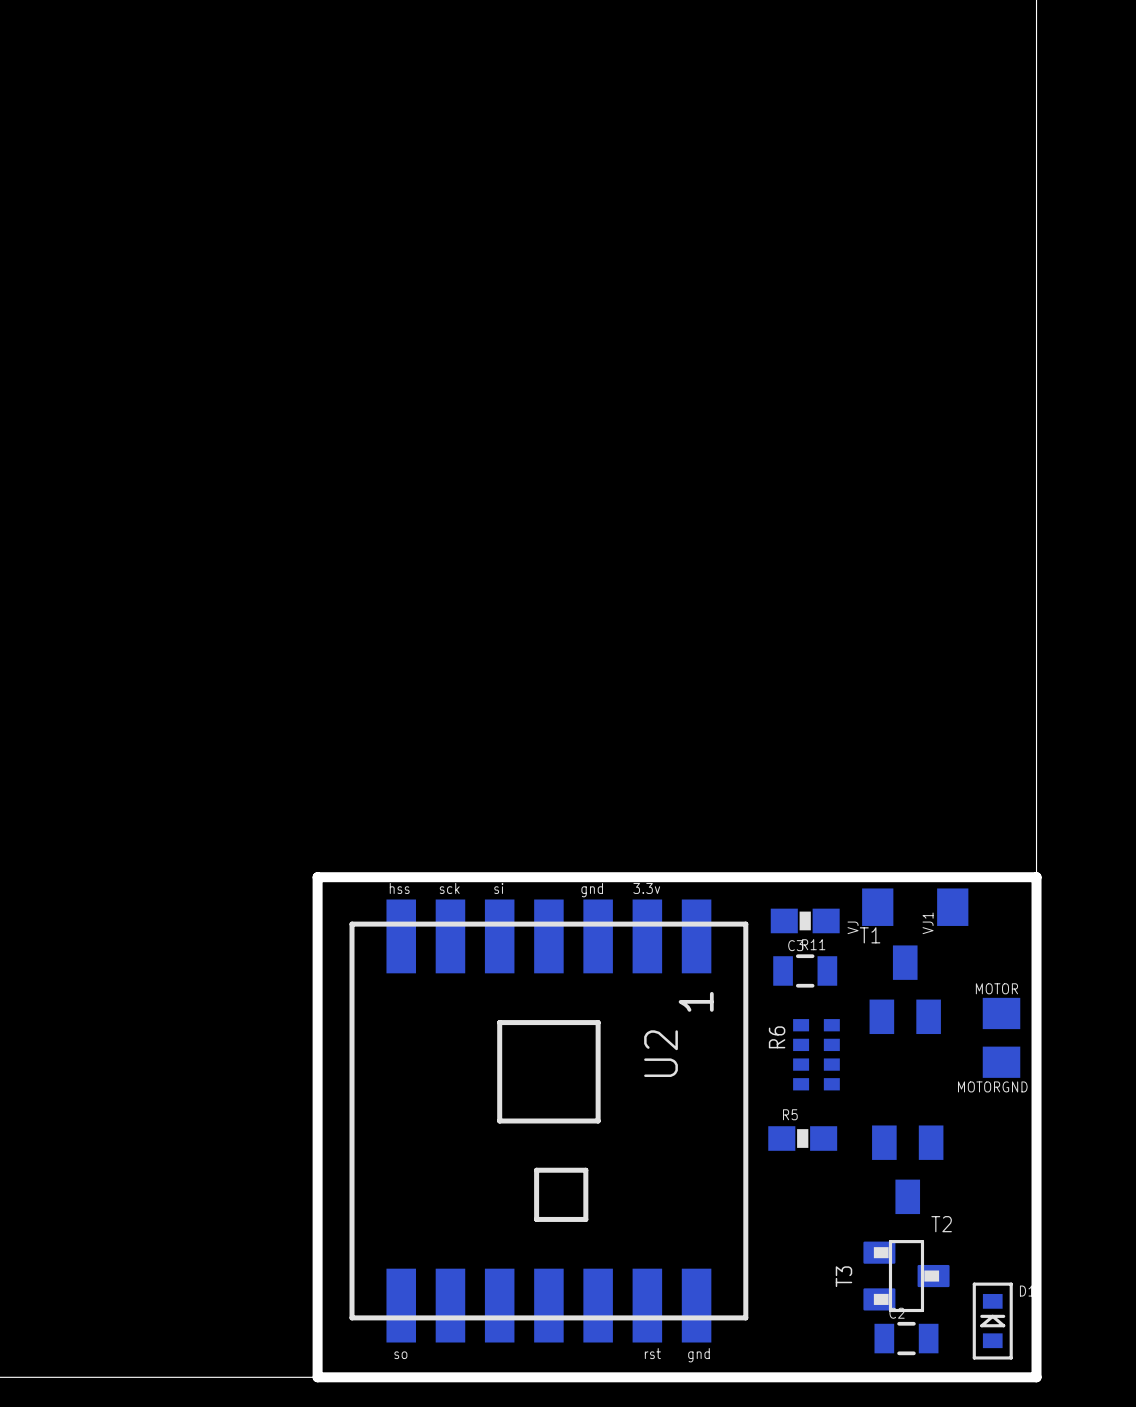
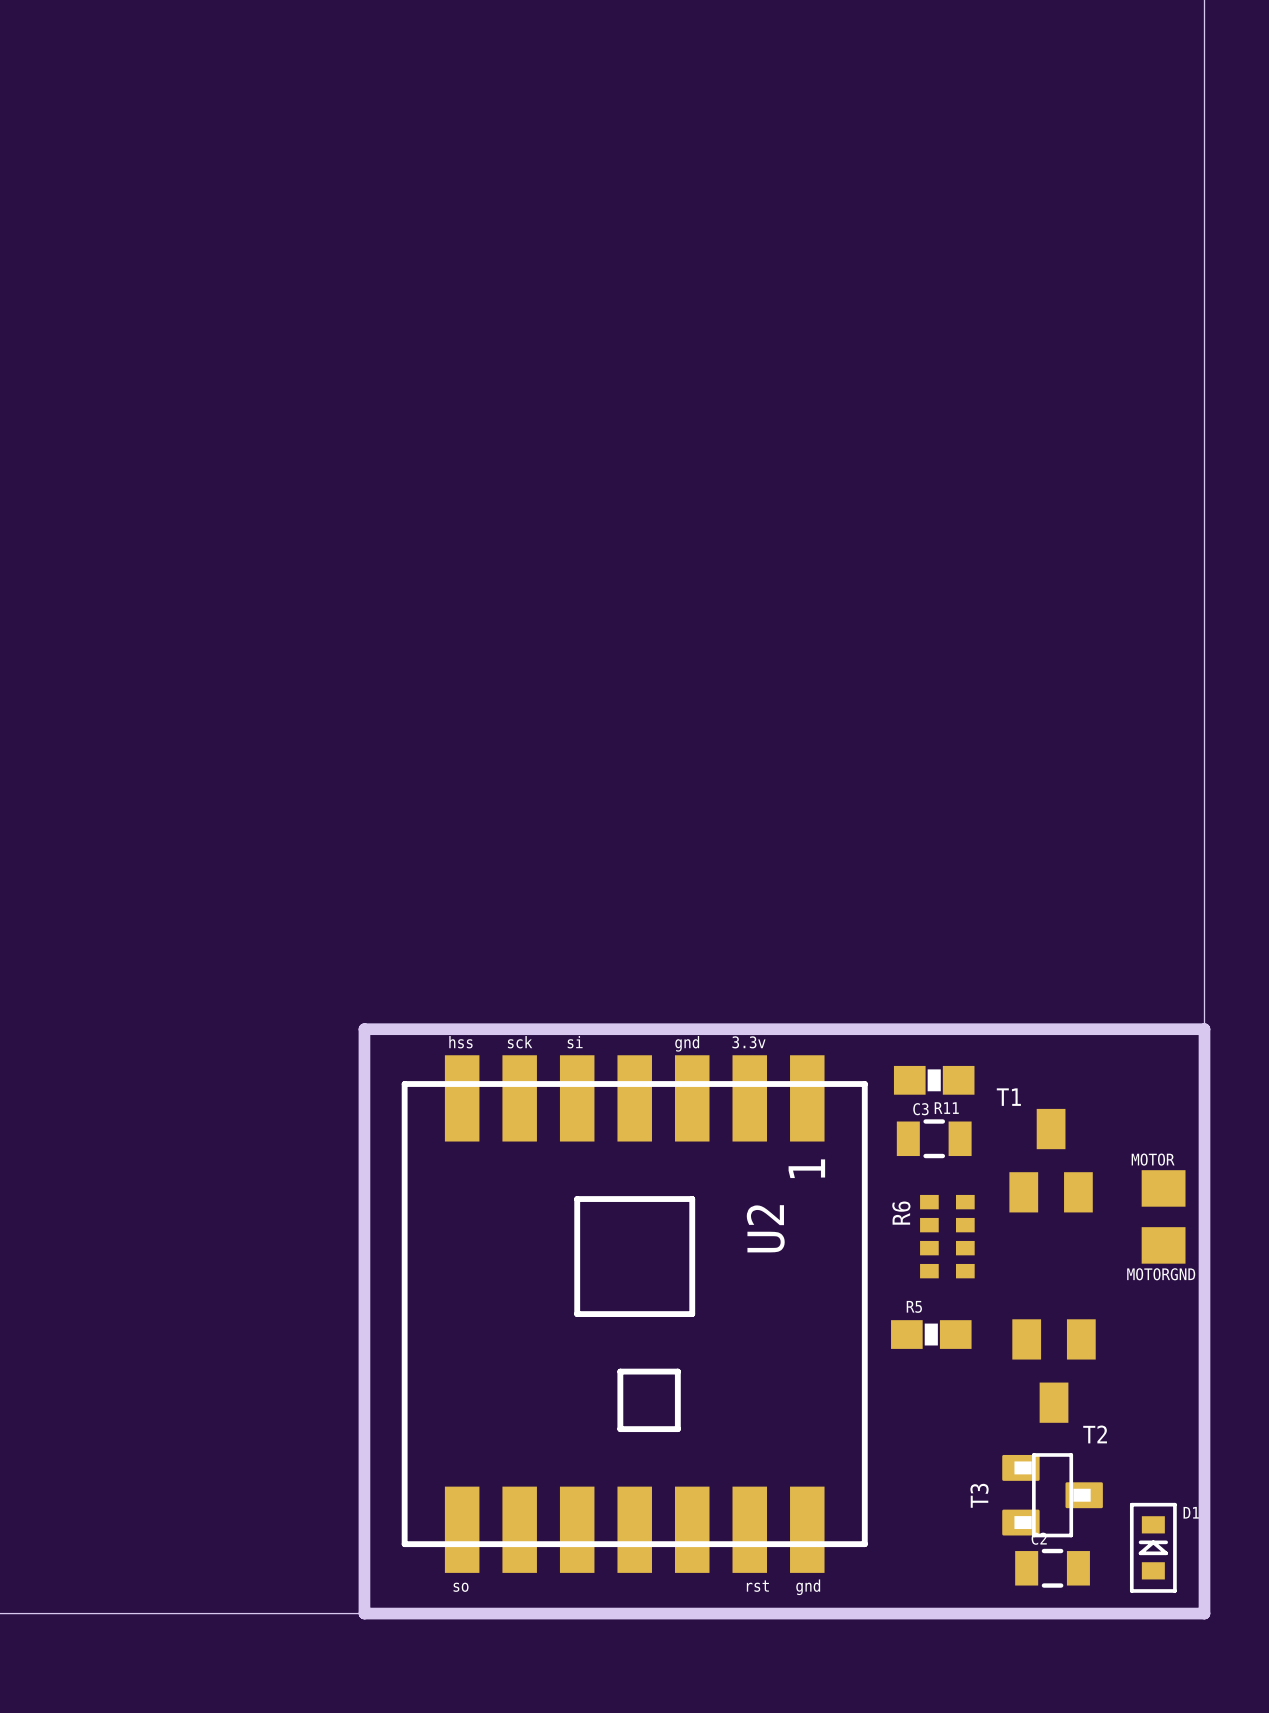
VJ: (877, 907) -> none
VJ1: (952, 907) -> none

